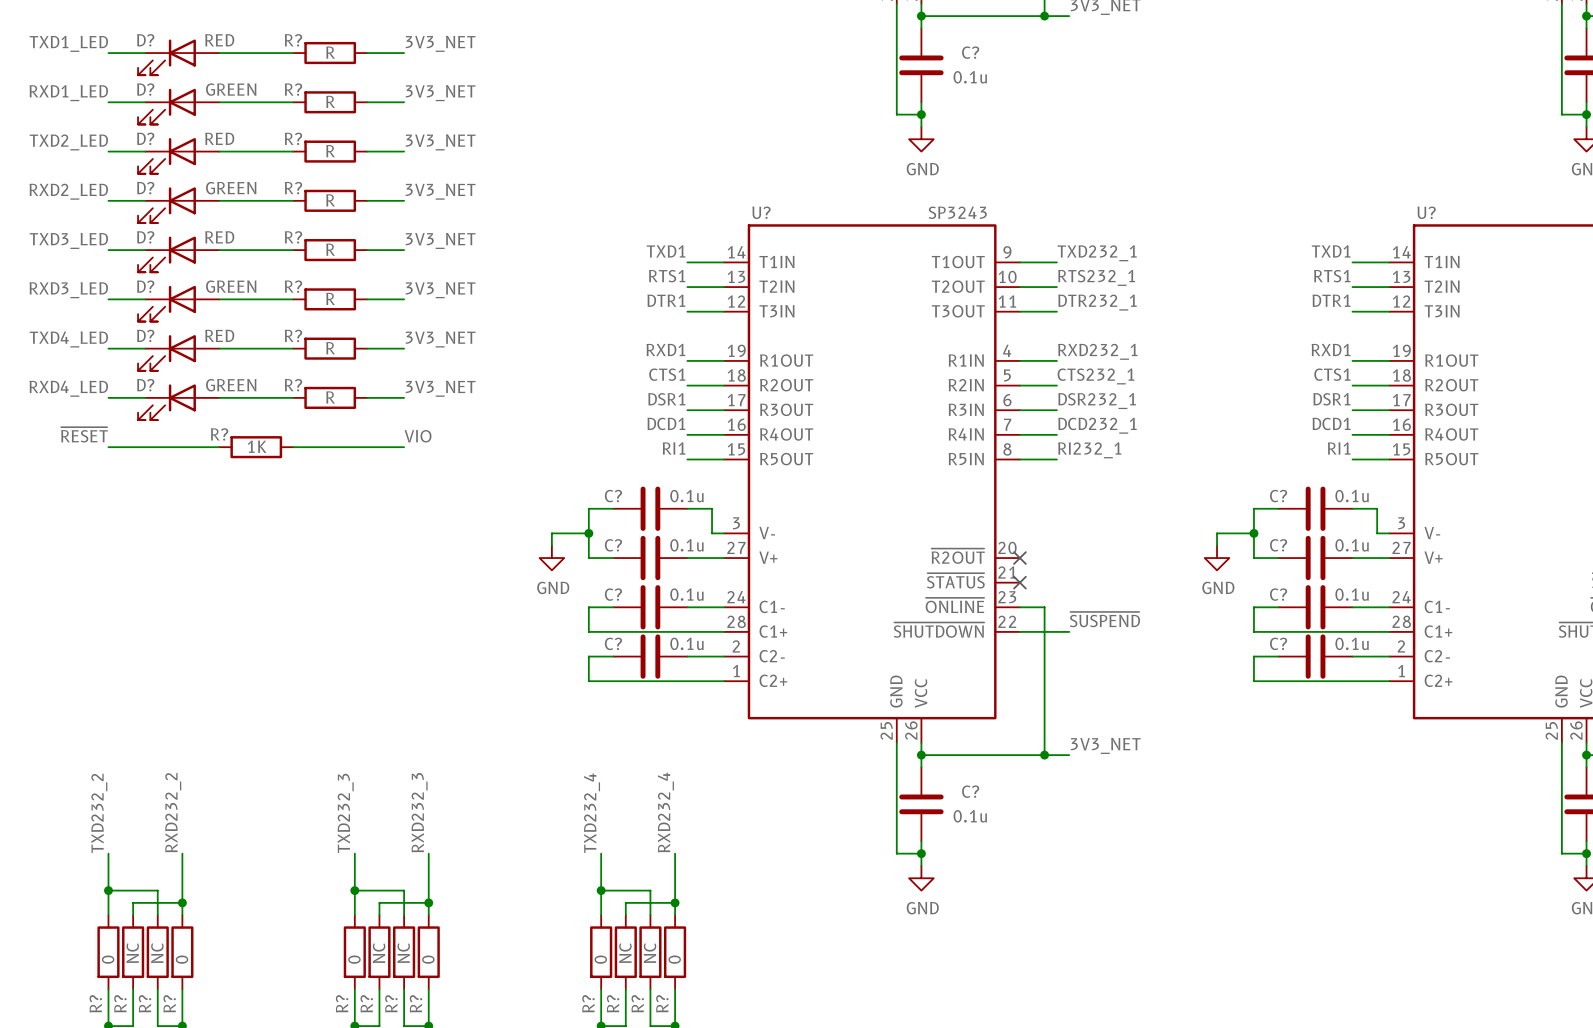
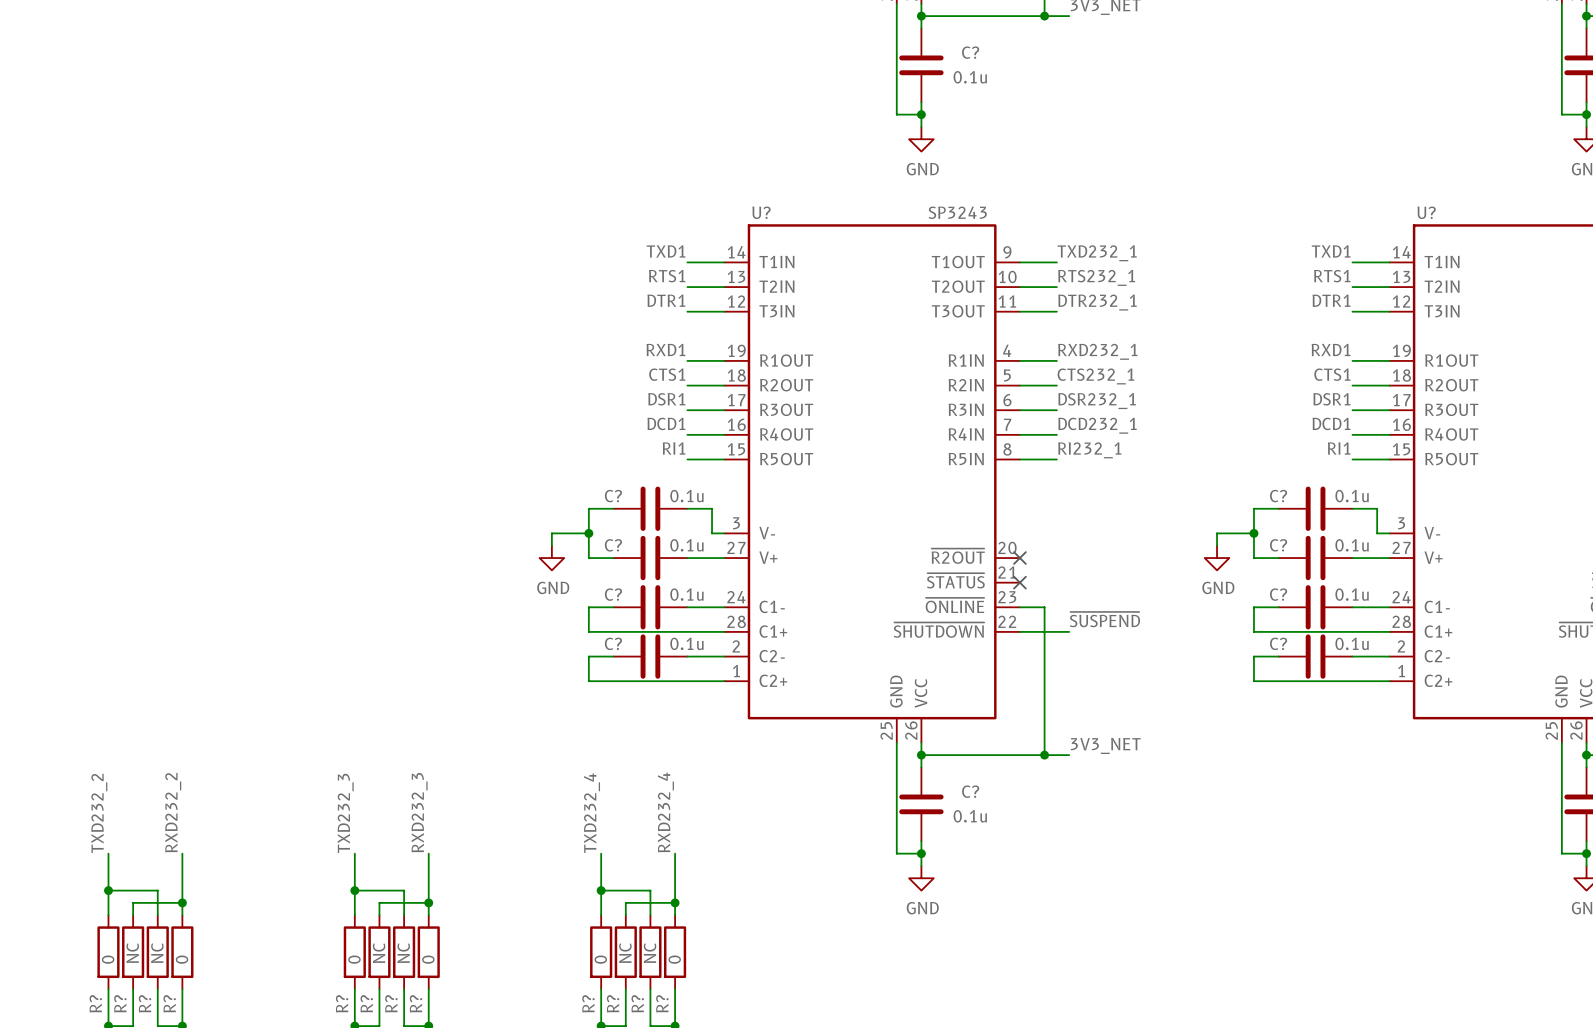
label: TXD1_LED (68, 43) -> none
label: 3V3_NET (440, 43) -> none
wire: (108, 53) (145, 53) -> none
wire: (219, 53) (293, 53) -> none
R?: R (330, 53) -> none
wire: (367, 53) (404, 53) -> none
D?: RED (178, 57) -> none
label: RXD1_LED (68, 93) -> none
label: 3V3_NET (440, 93) -> none
wire: (108, 102) (145, 102) -> none
wire: (219, 102) (293, 102) -> none
R?: R (330, 102) -> none
wire: (367, 102) (404, 102) -> none
D?: GREEN (178, 106) -> none
label: TXD2_LED (68, 142) -> none
label: 3V3_NET (440, 142) -> none
wire: (108, 151) (145, 151) -> none
wire: (219, 151) (293, 151) -> none
R?: R (330, 151) -> none
wire: (367, 151) (404, 151) -> none
D?: RED (178, 155) -> none
label: RXD2_LED (68, 191) -> none
label: 3V3_NET (440, 191) -> none
wire: (108, 200) (145, 200) -> none
wire: (219, 200) (293, 200) -> none
R?: R (330, 200) -> none
wire: (367, 200) (404, 200) -> none
D?: GREEN (178, 205) -> none
label: TXD3_LED (68, 240) -> none
label: 3V3_NET (440, 240) -> none
wire: (108, 250) (145, 250) -> none
wire: (219, 250) (293, 250) -> none
R?: R (330, 250) -> none
wire: (367, 250) (404, 250) -> none
D?: RED (178, 254) -> none
label: RXD3_LED (68, 290) -> none
label: 3V3_NET (440, 290) -> none
wire: (108, 299) (145, 299) -> none
wire: (219, 299) (293, 299) -> none
R?: R (330, 299) -> none
wire: (367, 299) (404, 299) -> none
D?: GREEN (178, 303) -> none
label: TXD4_LED (68, 339) -> none
label: 3V3_NET (440, 339) -> none
wire: (108, 348) (145, 348) -> none
wire: (219, 348) (293, 348) -> none
R?: R (330, 348) -> none
wire: (367, 348) (404, 348) -> none
D?: RED (178, 352) -> none
label: RXD4_LED (68, 388) -> none
label: 3V3_NET (440, 388) -> none
wire: (108, 397) (145, 397) -> none
wire: (219, 397) (293, 397) -> none
R?: R (330, 397) -> none
wire: (367, 397) (404, 397) -> none
D?: GREEN (178, 402) -> none
label: ~{RESET} (84, 434) -> none
label: VIO (418, 436) -> none
wire: (108, 447) (219, 447) -> none
R?: 1K (256, 447) -> none
wire: (293, 447) (404, 447) -> none

